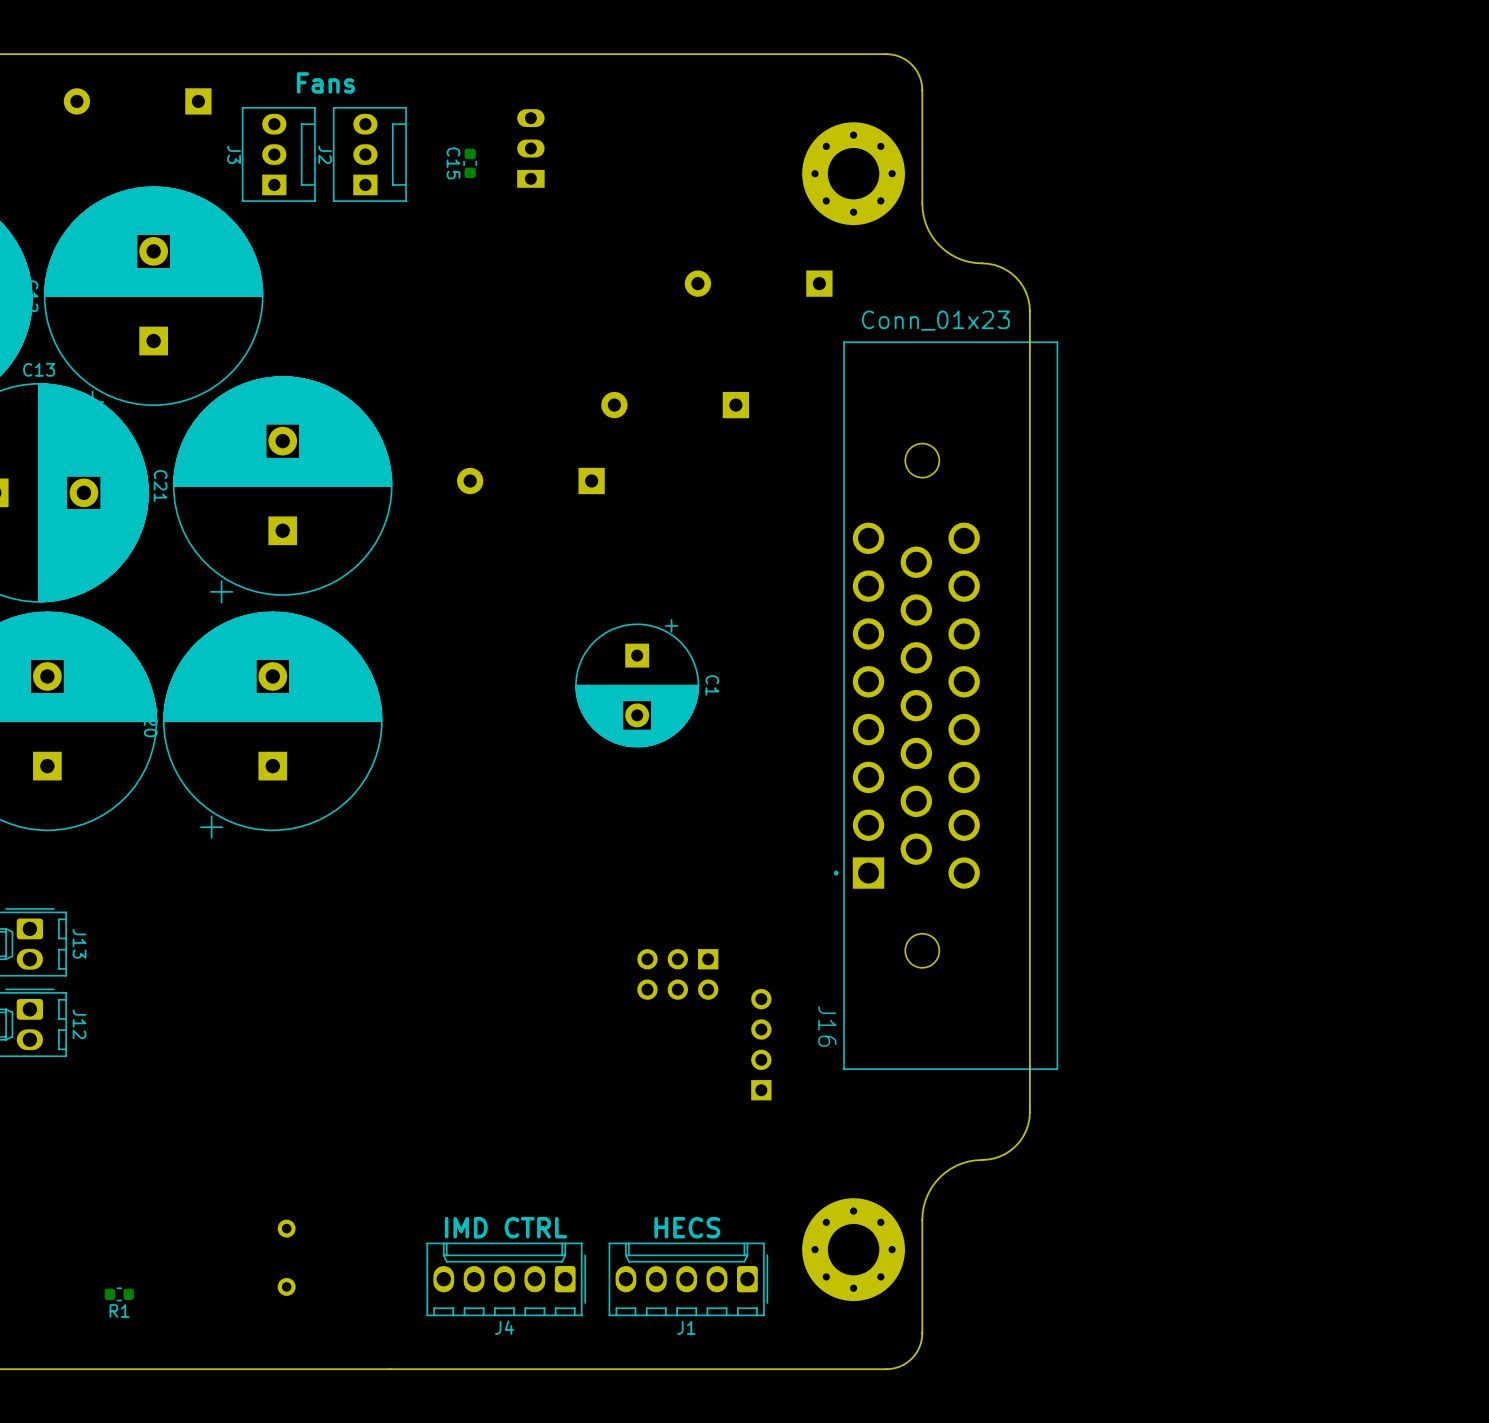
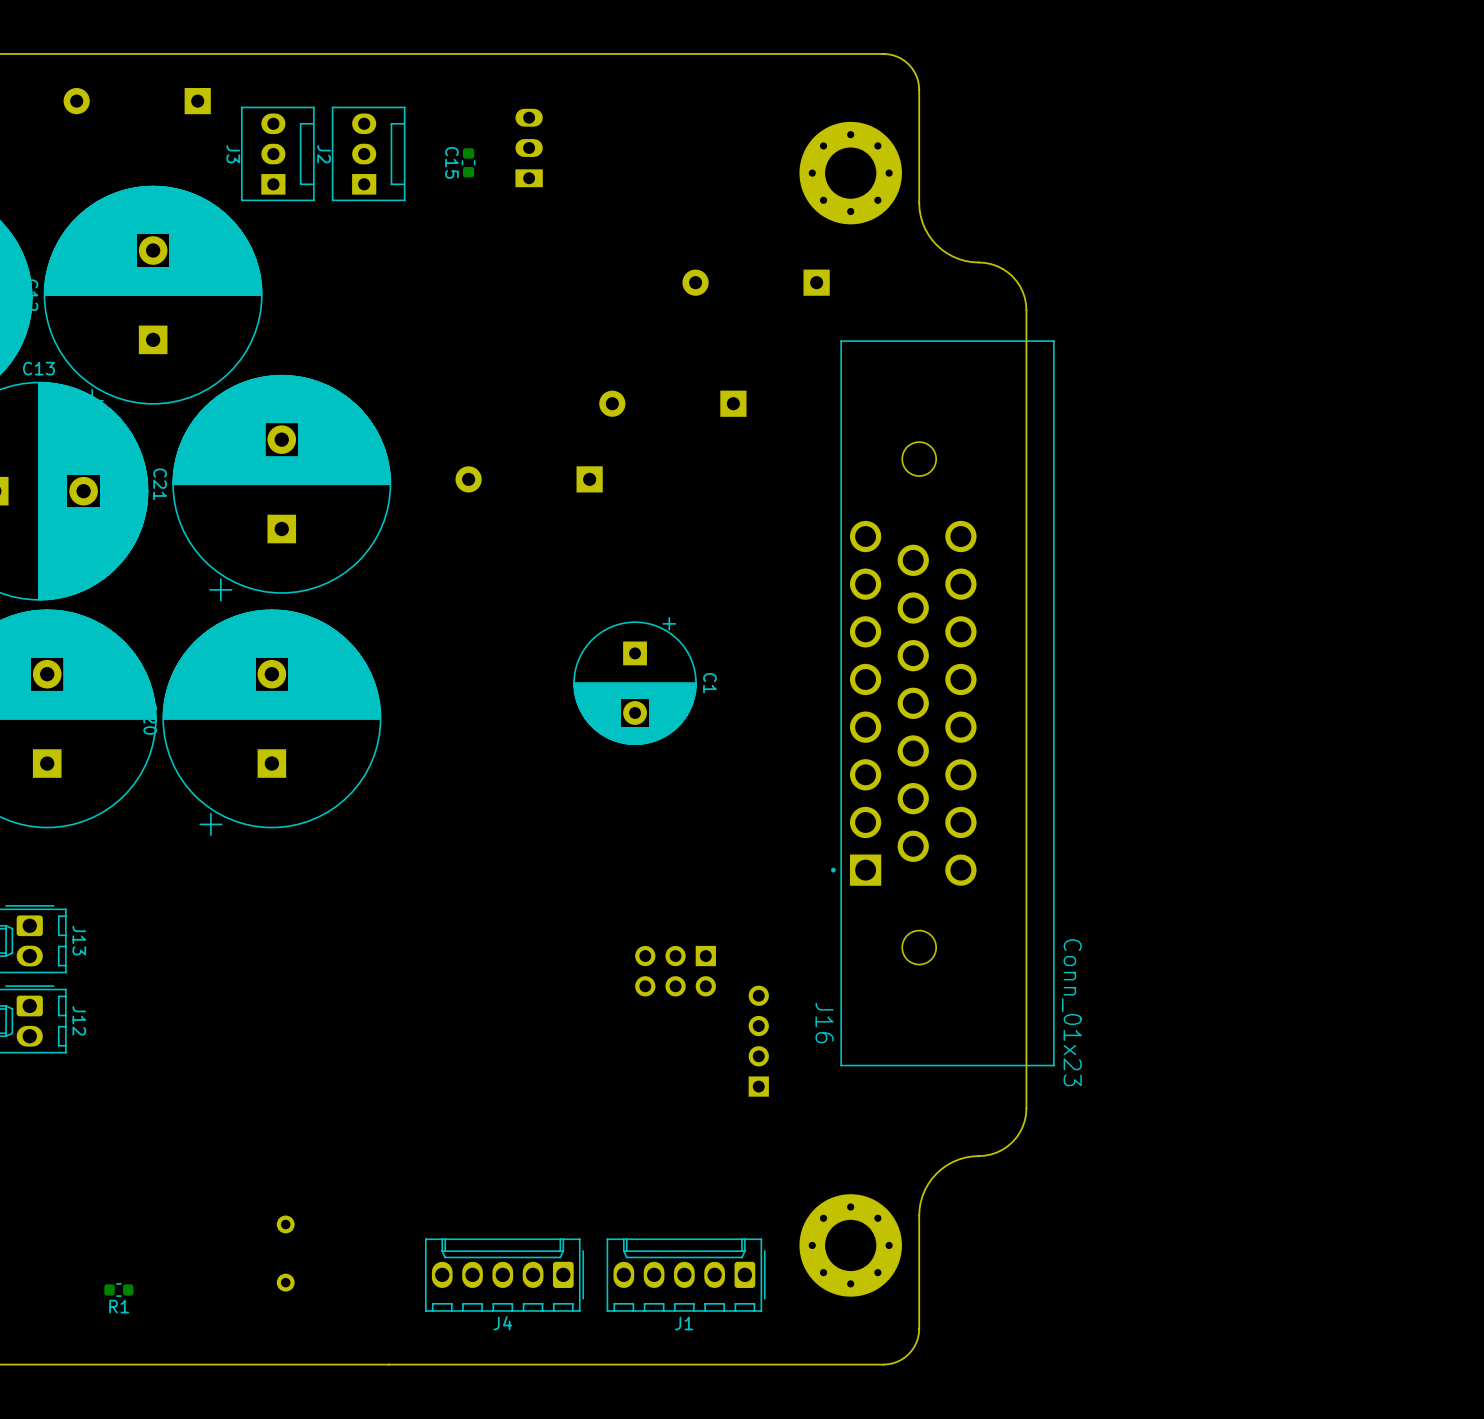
text: Fans (326, 82) -> none
J16 value rotation: 0° (935, 320) -> 90° clockwise (1071, 1012)
J16 value position: Conn_01x23 (935, 320) -> Conn_01x23 (1071, 1012)
text: IMD CTRL (506, 1227) -> none
text: HECS (687, 1227) -> none

